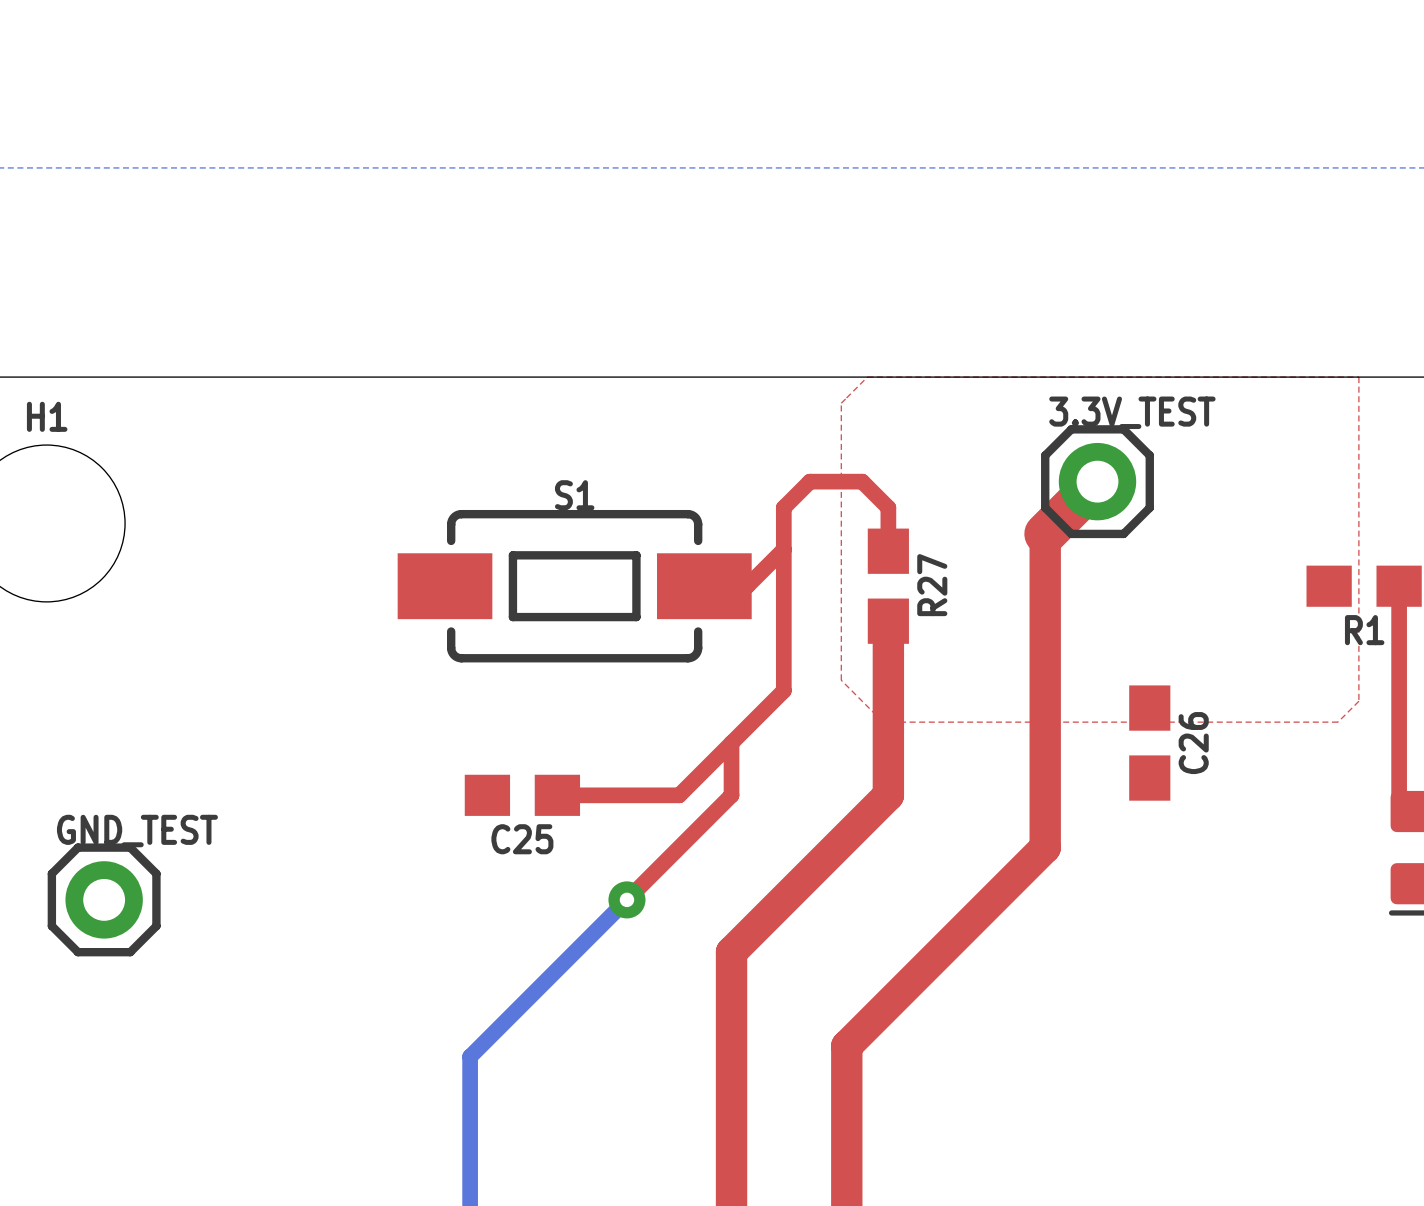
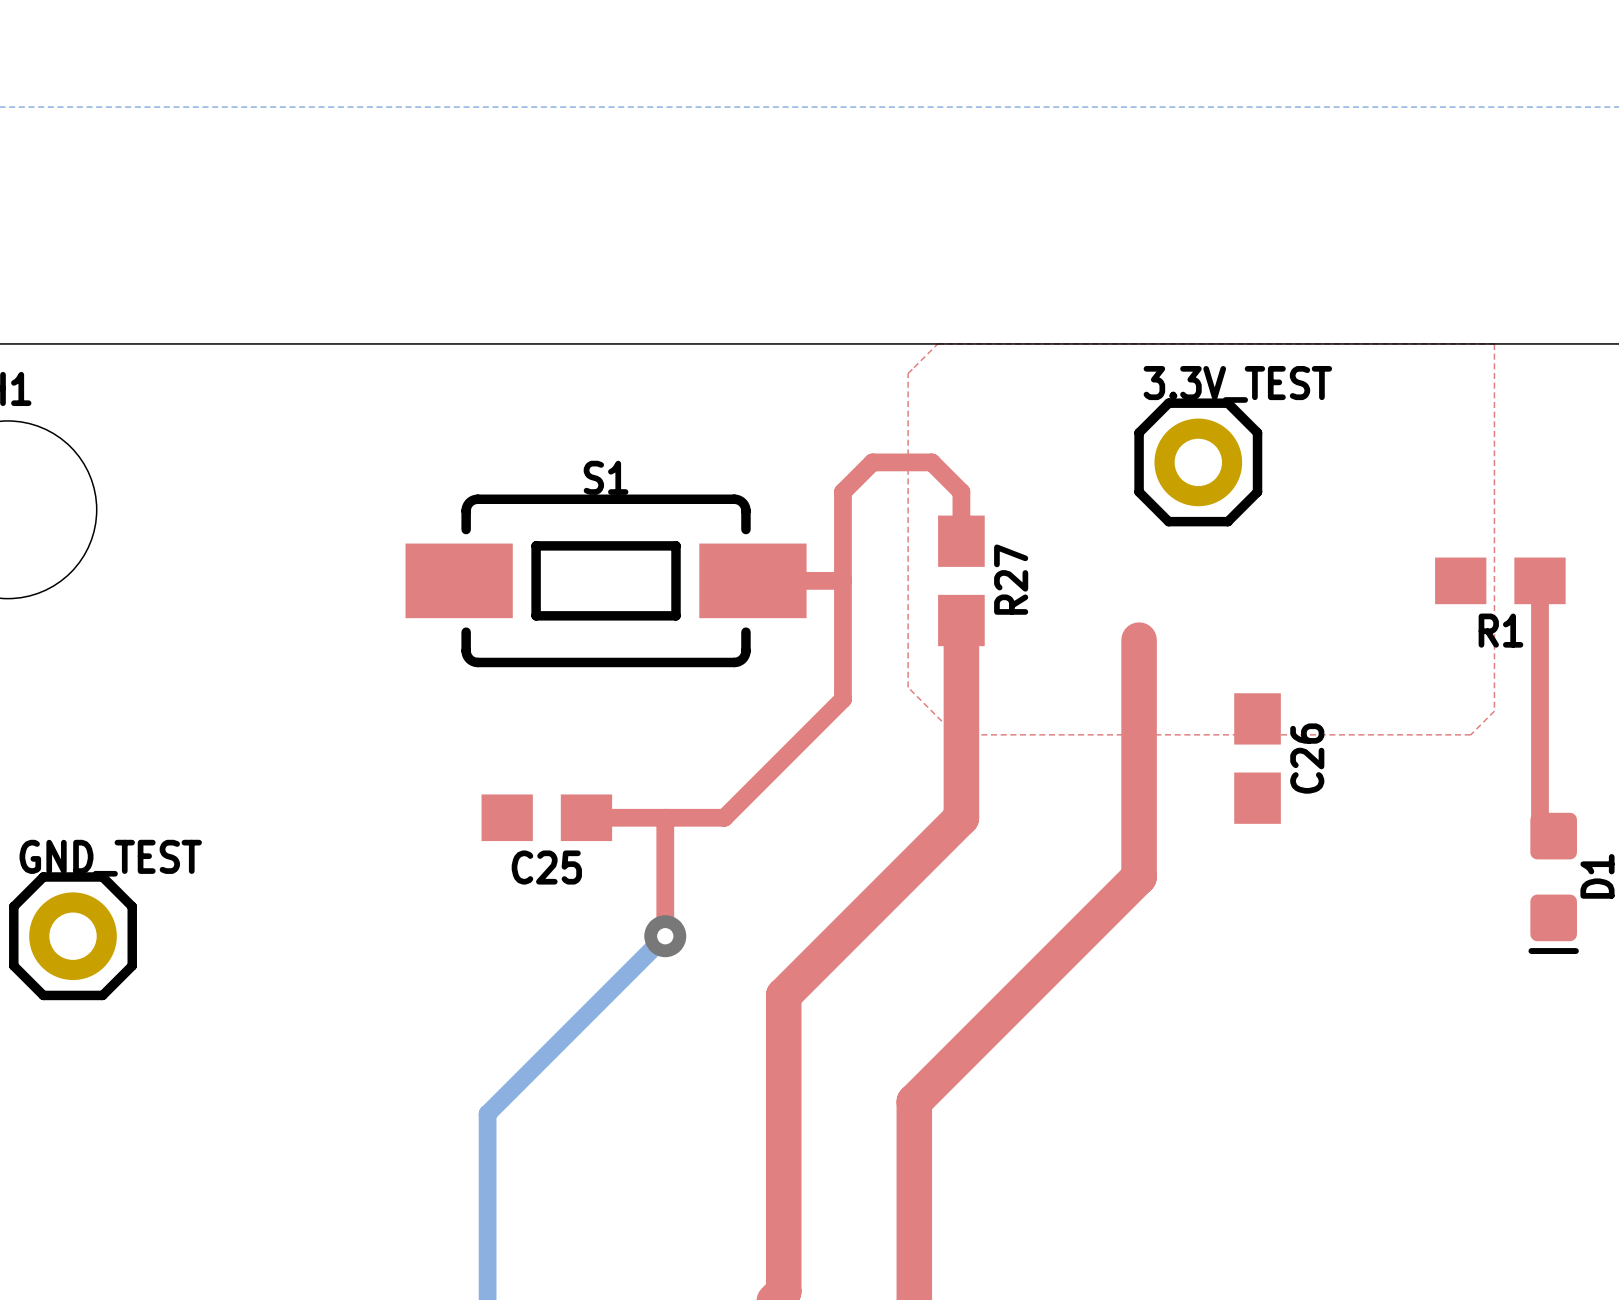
top track: (1097, 481) (1045, 533) (1045, 638) -> none
top track: (783, 549) (747, 586) -> (842, 580) (801, 580)
top track: (731, 743) (731, 795) (626, 899) -> (665, 817) (665, 936)

